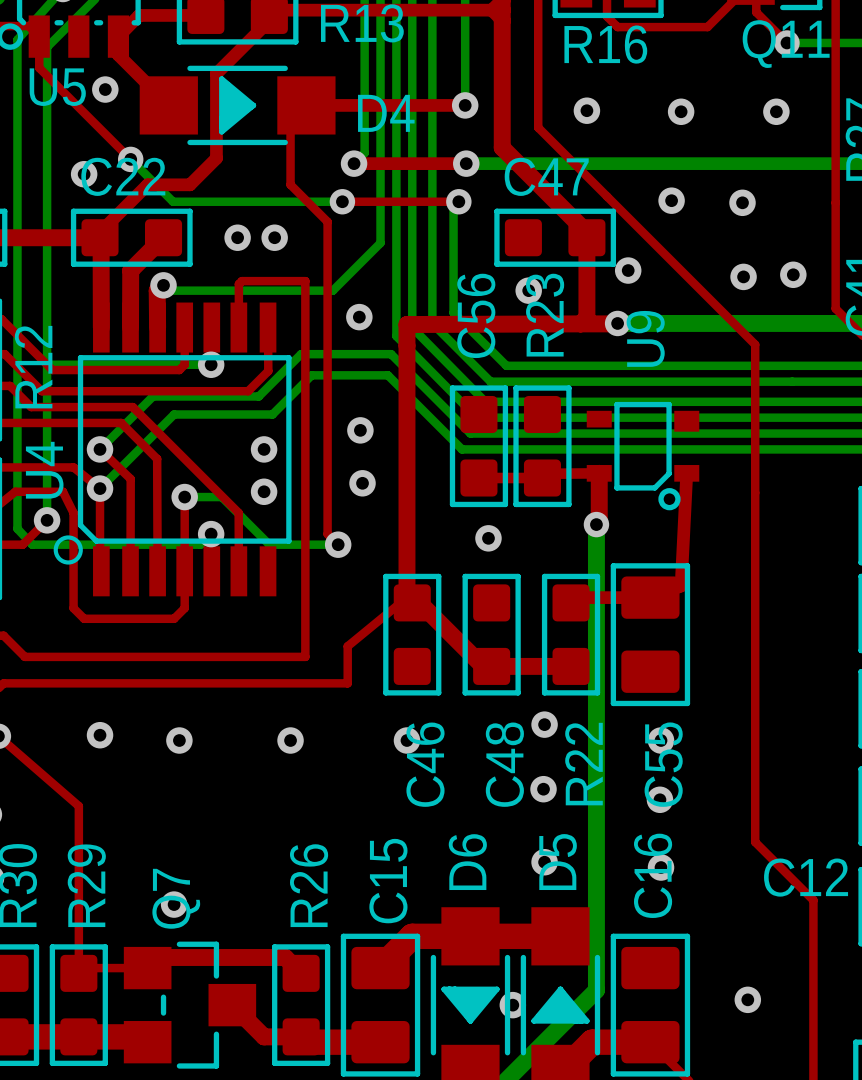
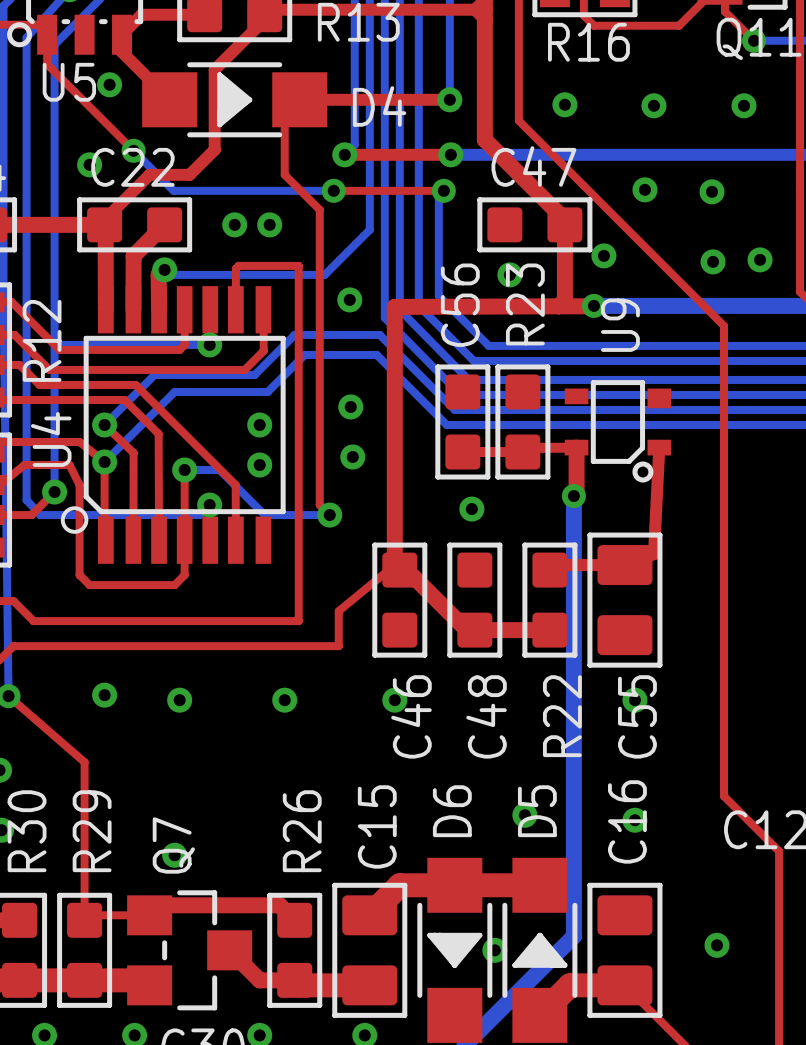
via: (544, 724) -> none
via: (543, 789) -> none
via: (659, 799) -> none

